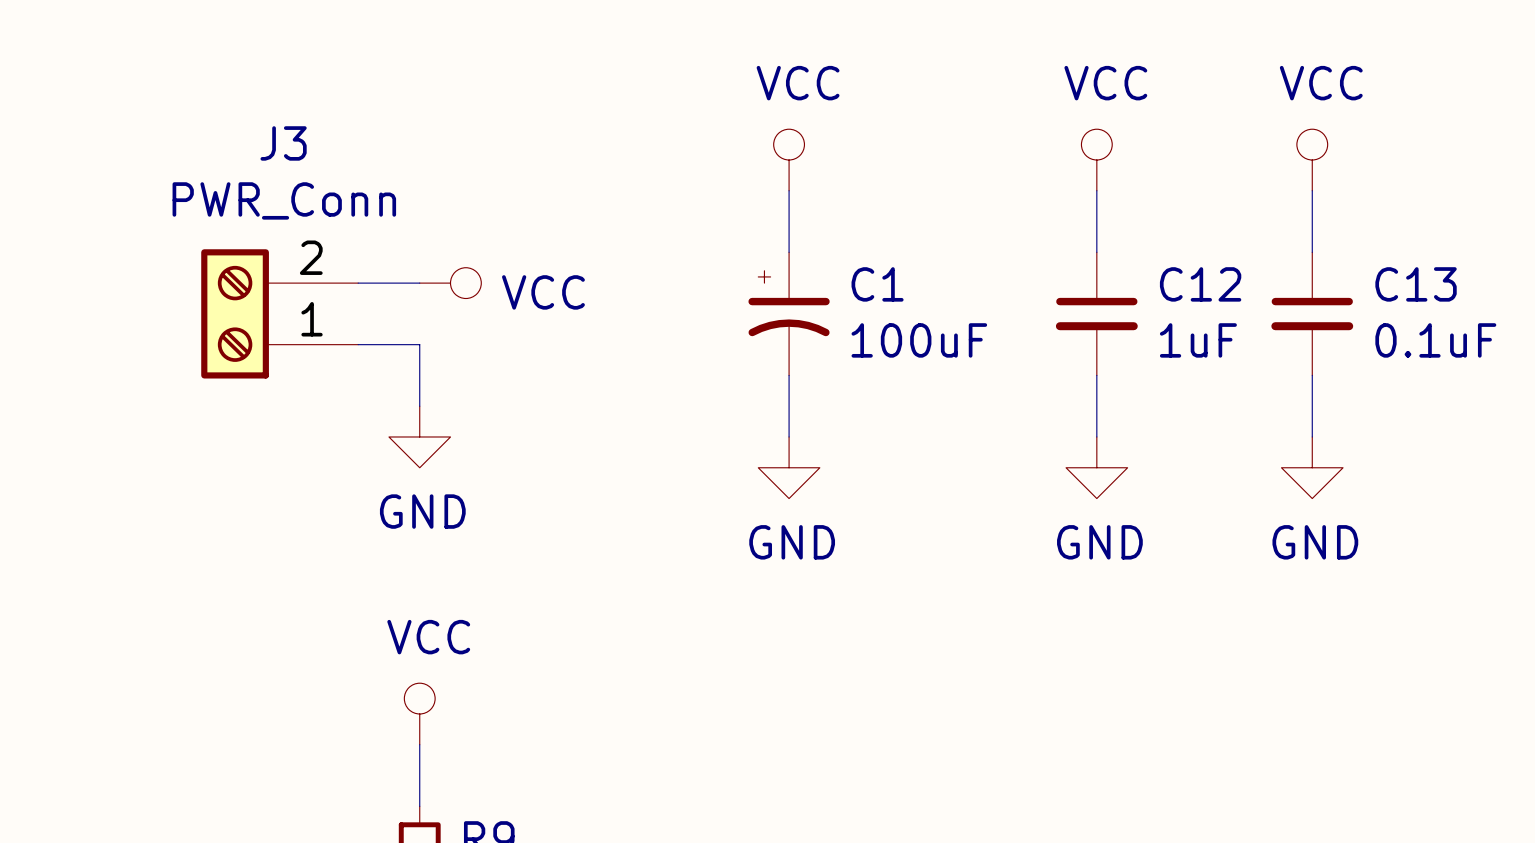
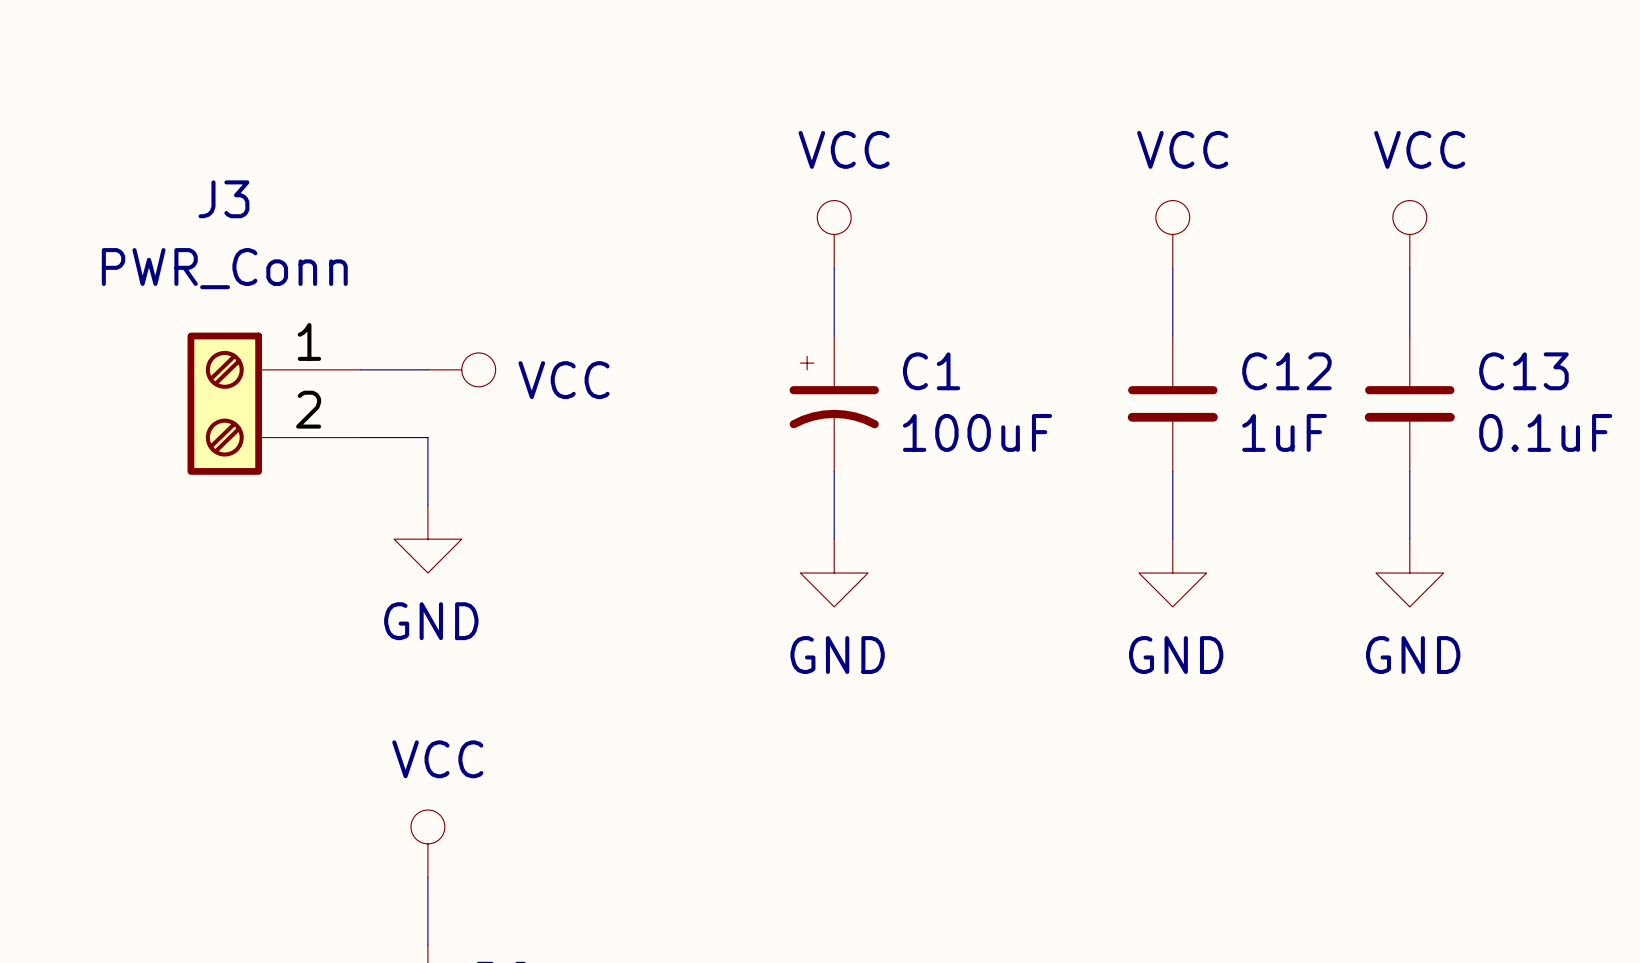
J3 name position: J3 (283, 143) -> J3 (223, 199)
J3 value position: PWR_Conn (284, 200) -> PWR_Conn (224, 268)
J3 flip: as is (235, 313) -> up-down (224, 403)

